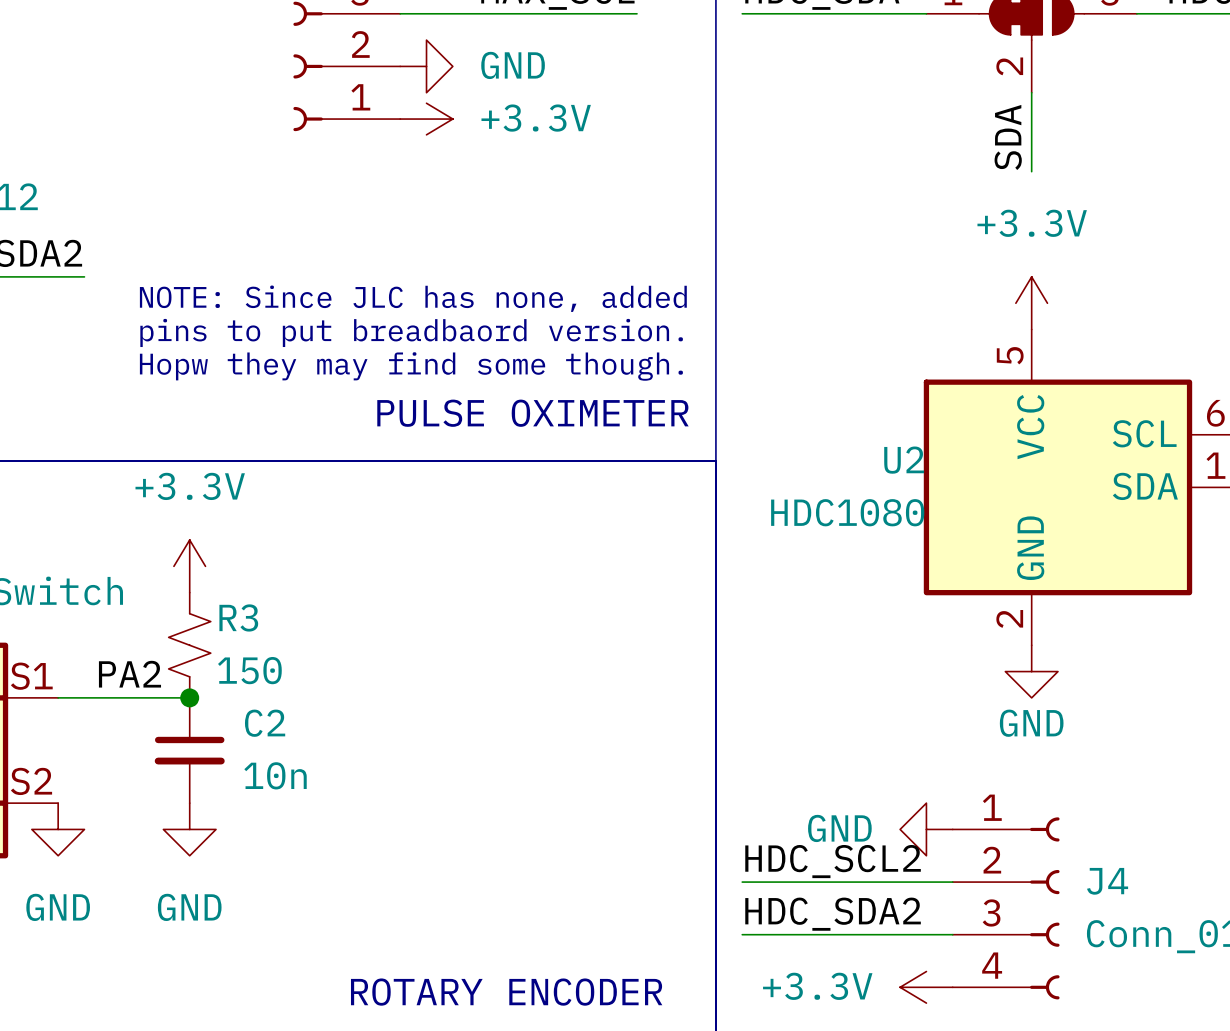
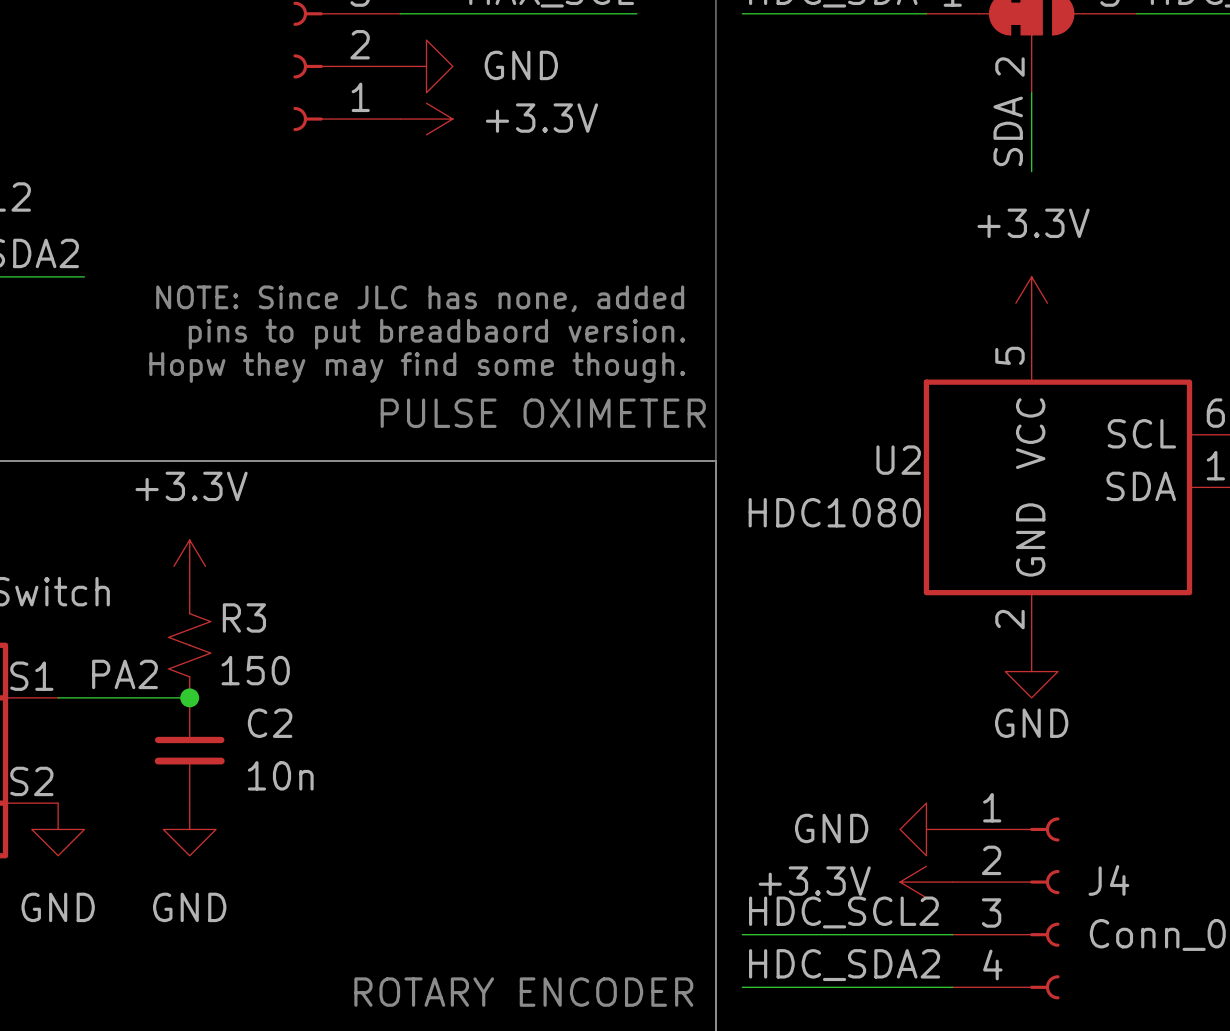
label: HDC_SCL2 (833, 861) -> none
wire: (742, 882) (952, 882) -> (742, 987) (952, 987)
power symbol: none -> +3.3V (926, 882)
label: HDC_SDA2 (833, 914) -> HDC_SCL2 (843, 912)
label: none -> HDC_SDA2 (844, 965)
power symbol: +3.3V (926, 987) -> none

